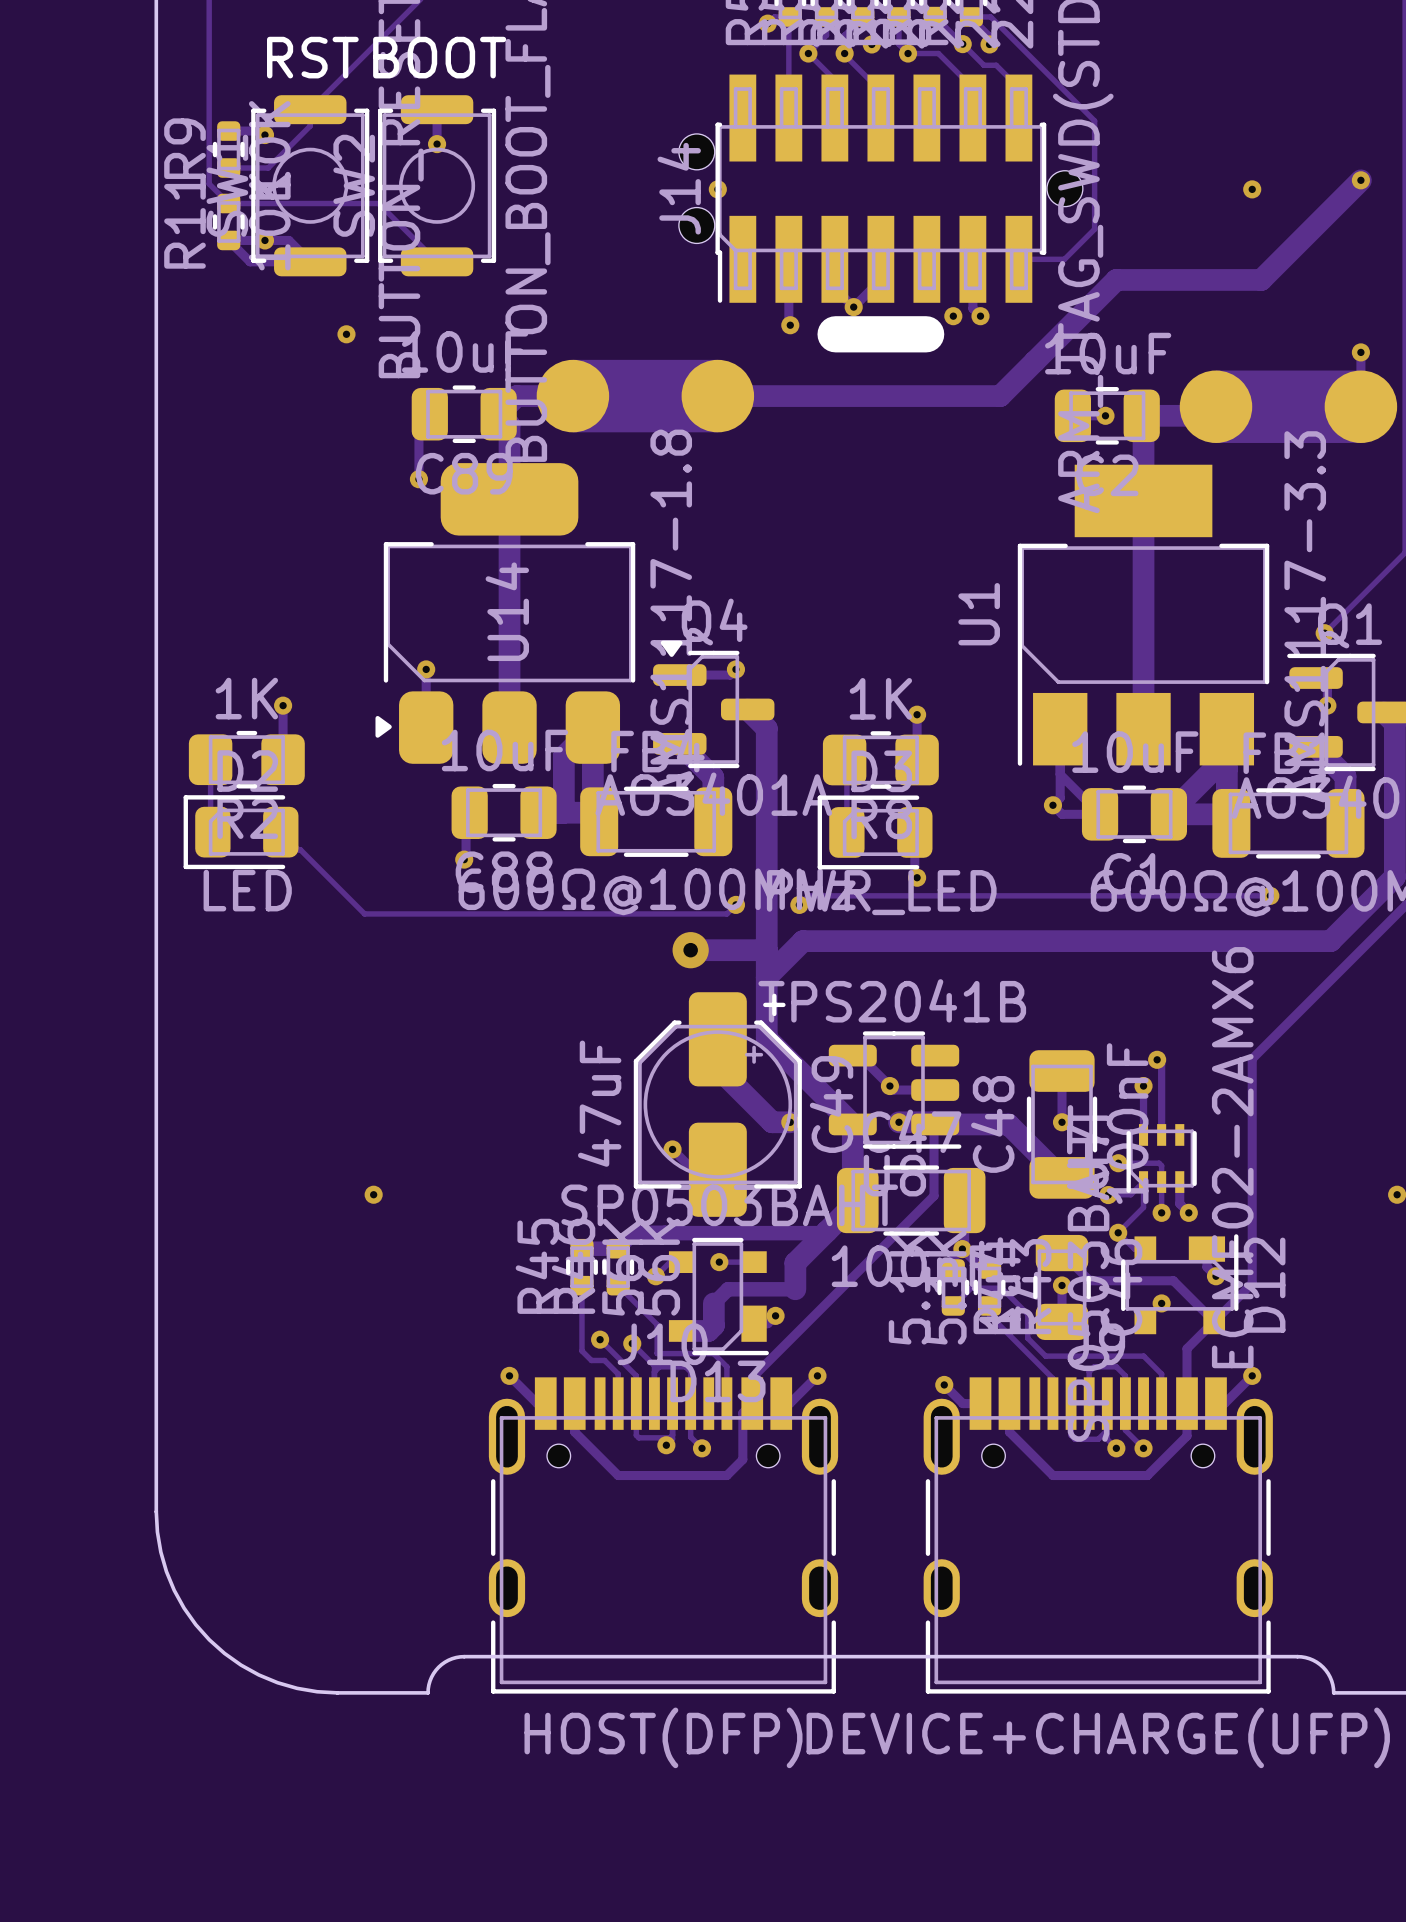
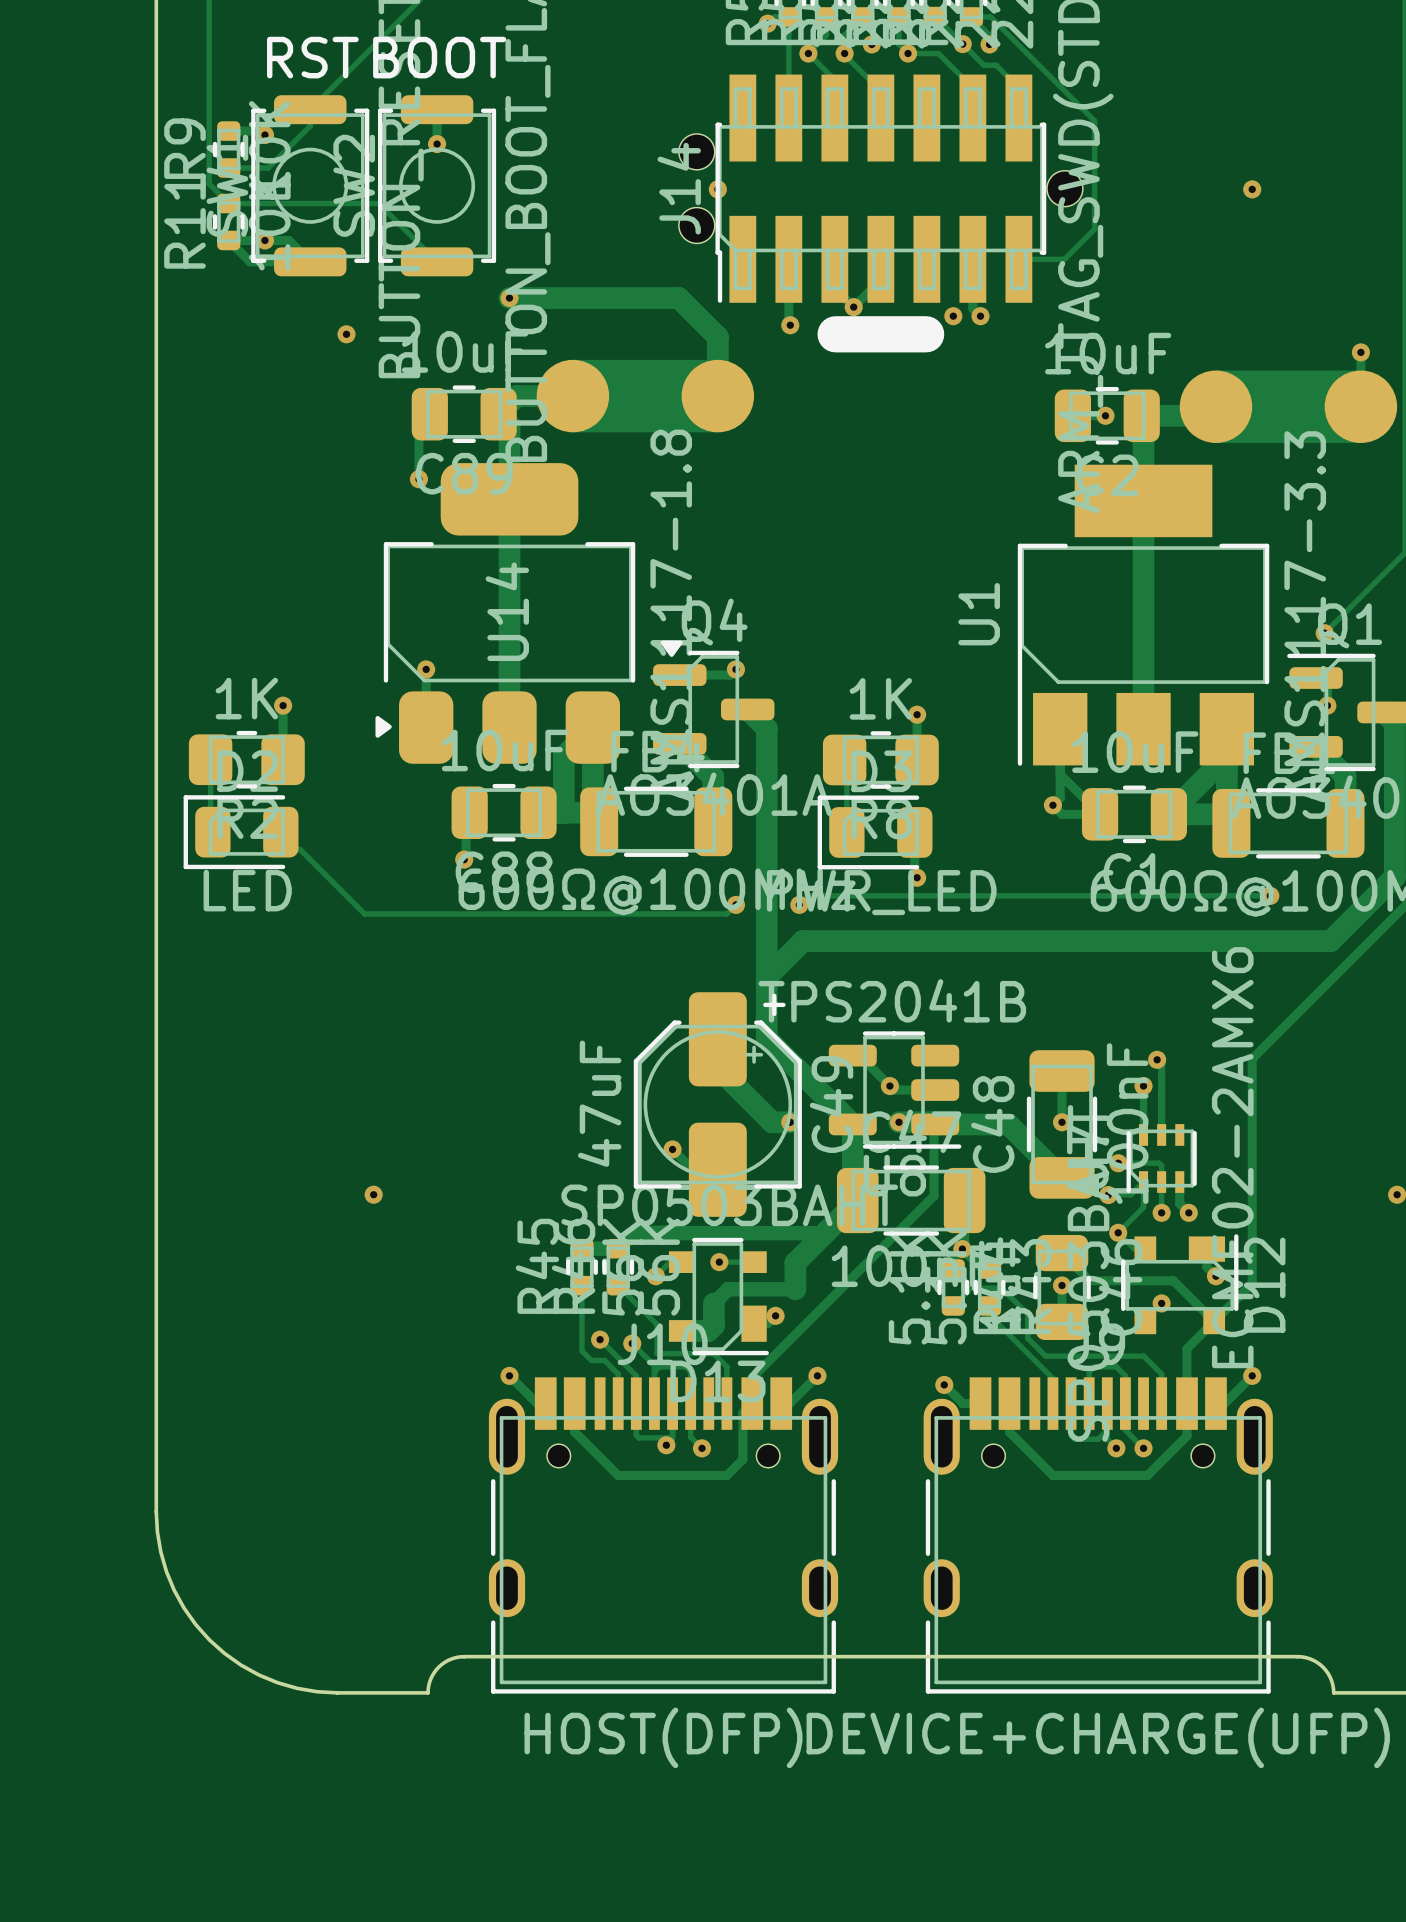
track: (1360, 180) (1261, 279) (1116, 279) (1000, 396) (717, 396) -> (509, 298) (678, 298) (717, 337) (717, 396)
via: (1360, 180) -> none
via: none -> (509, 298)
track: (690, 950) (766, 950) -> none
via: (690, 950) -> none

